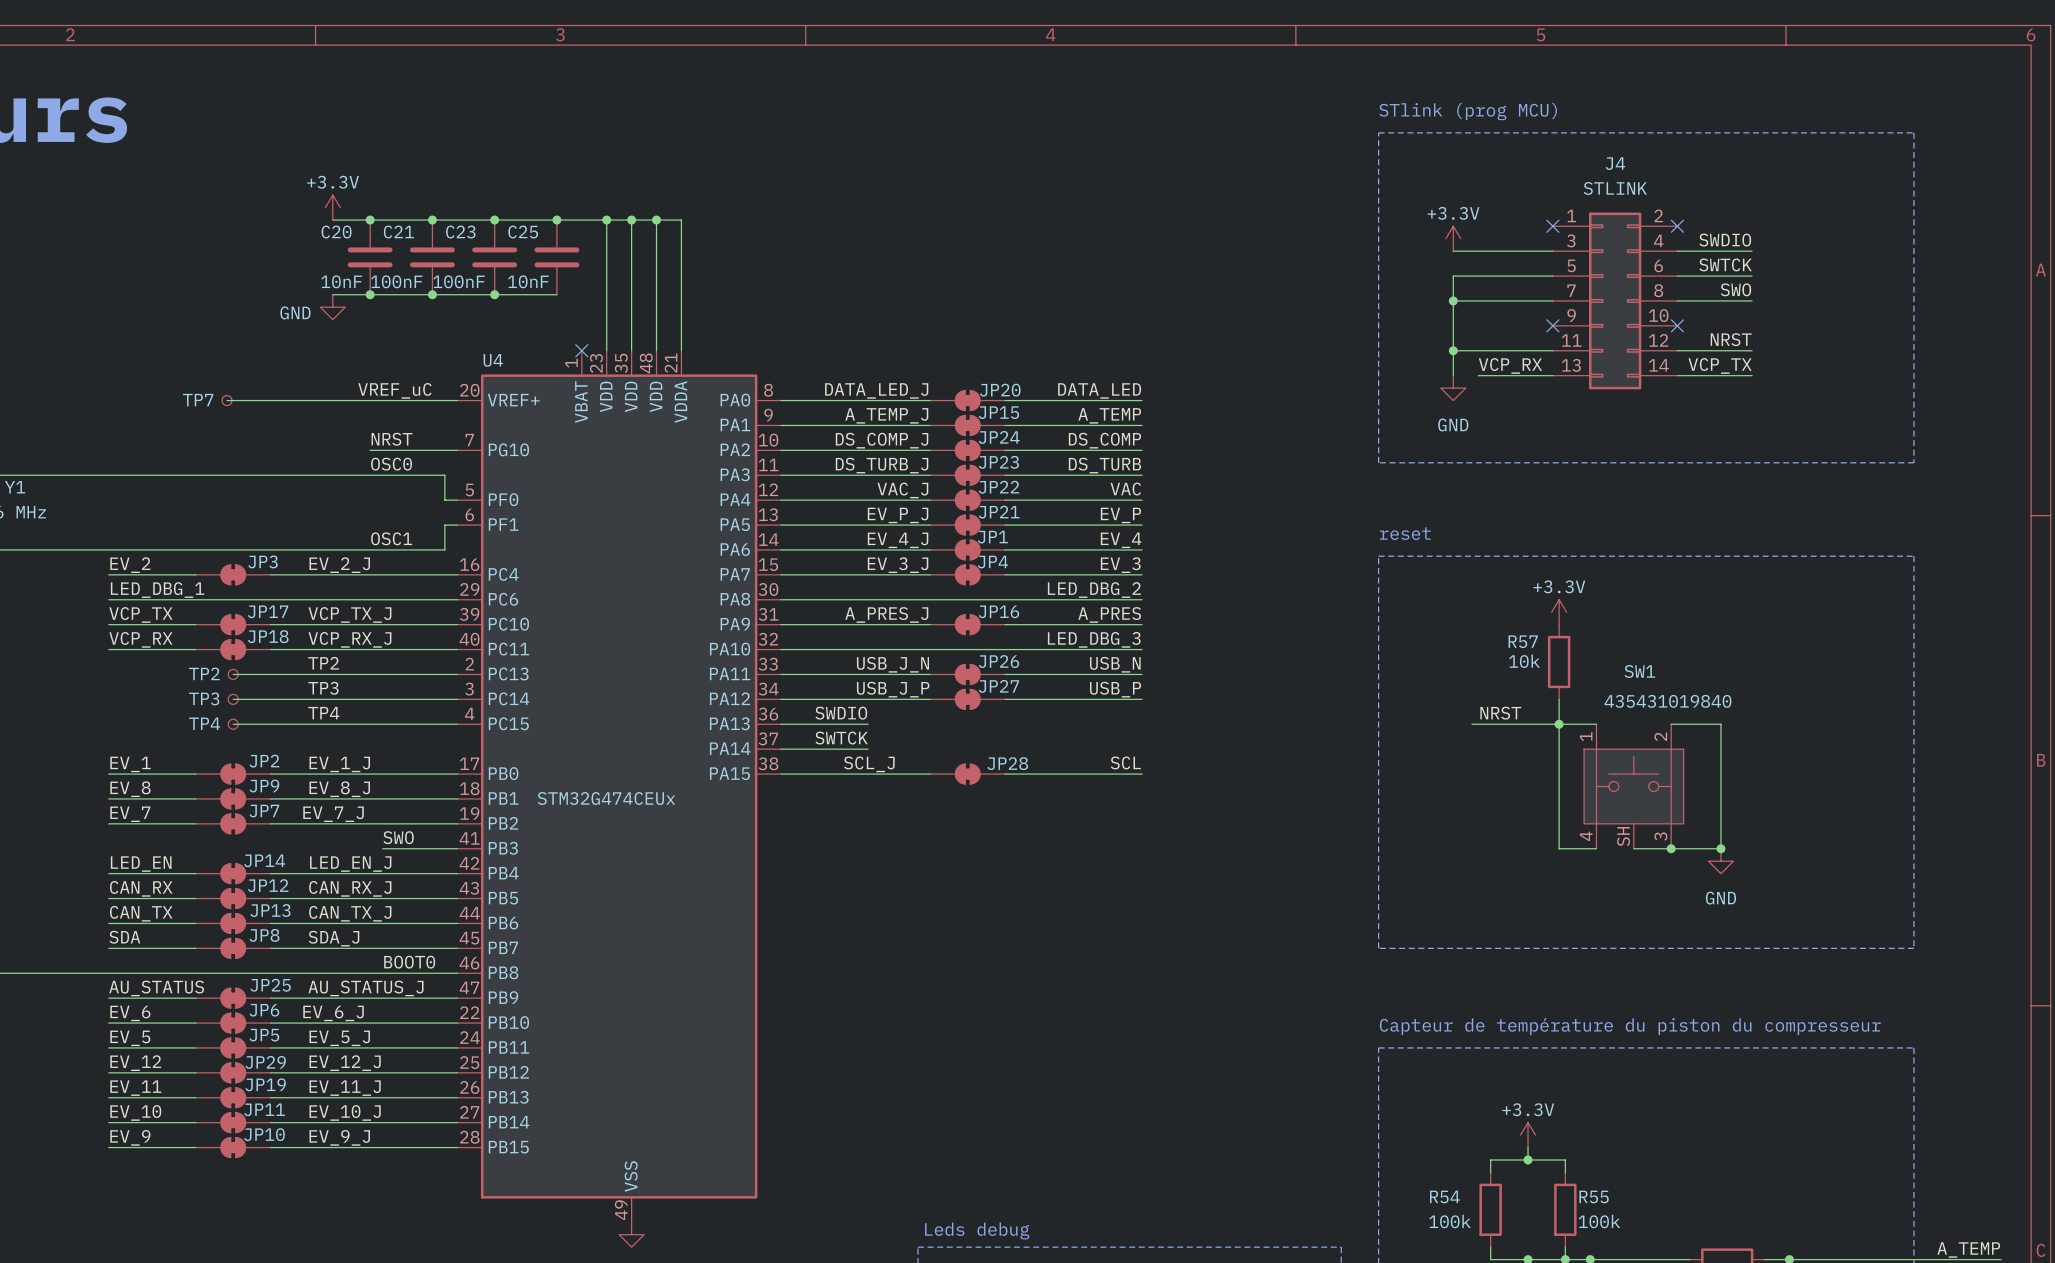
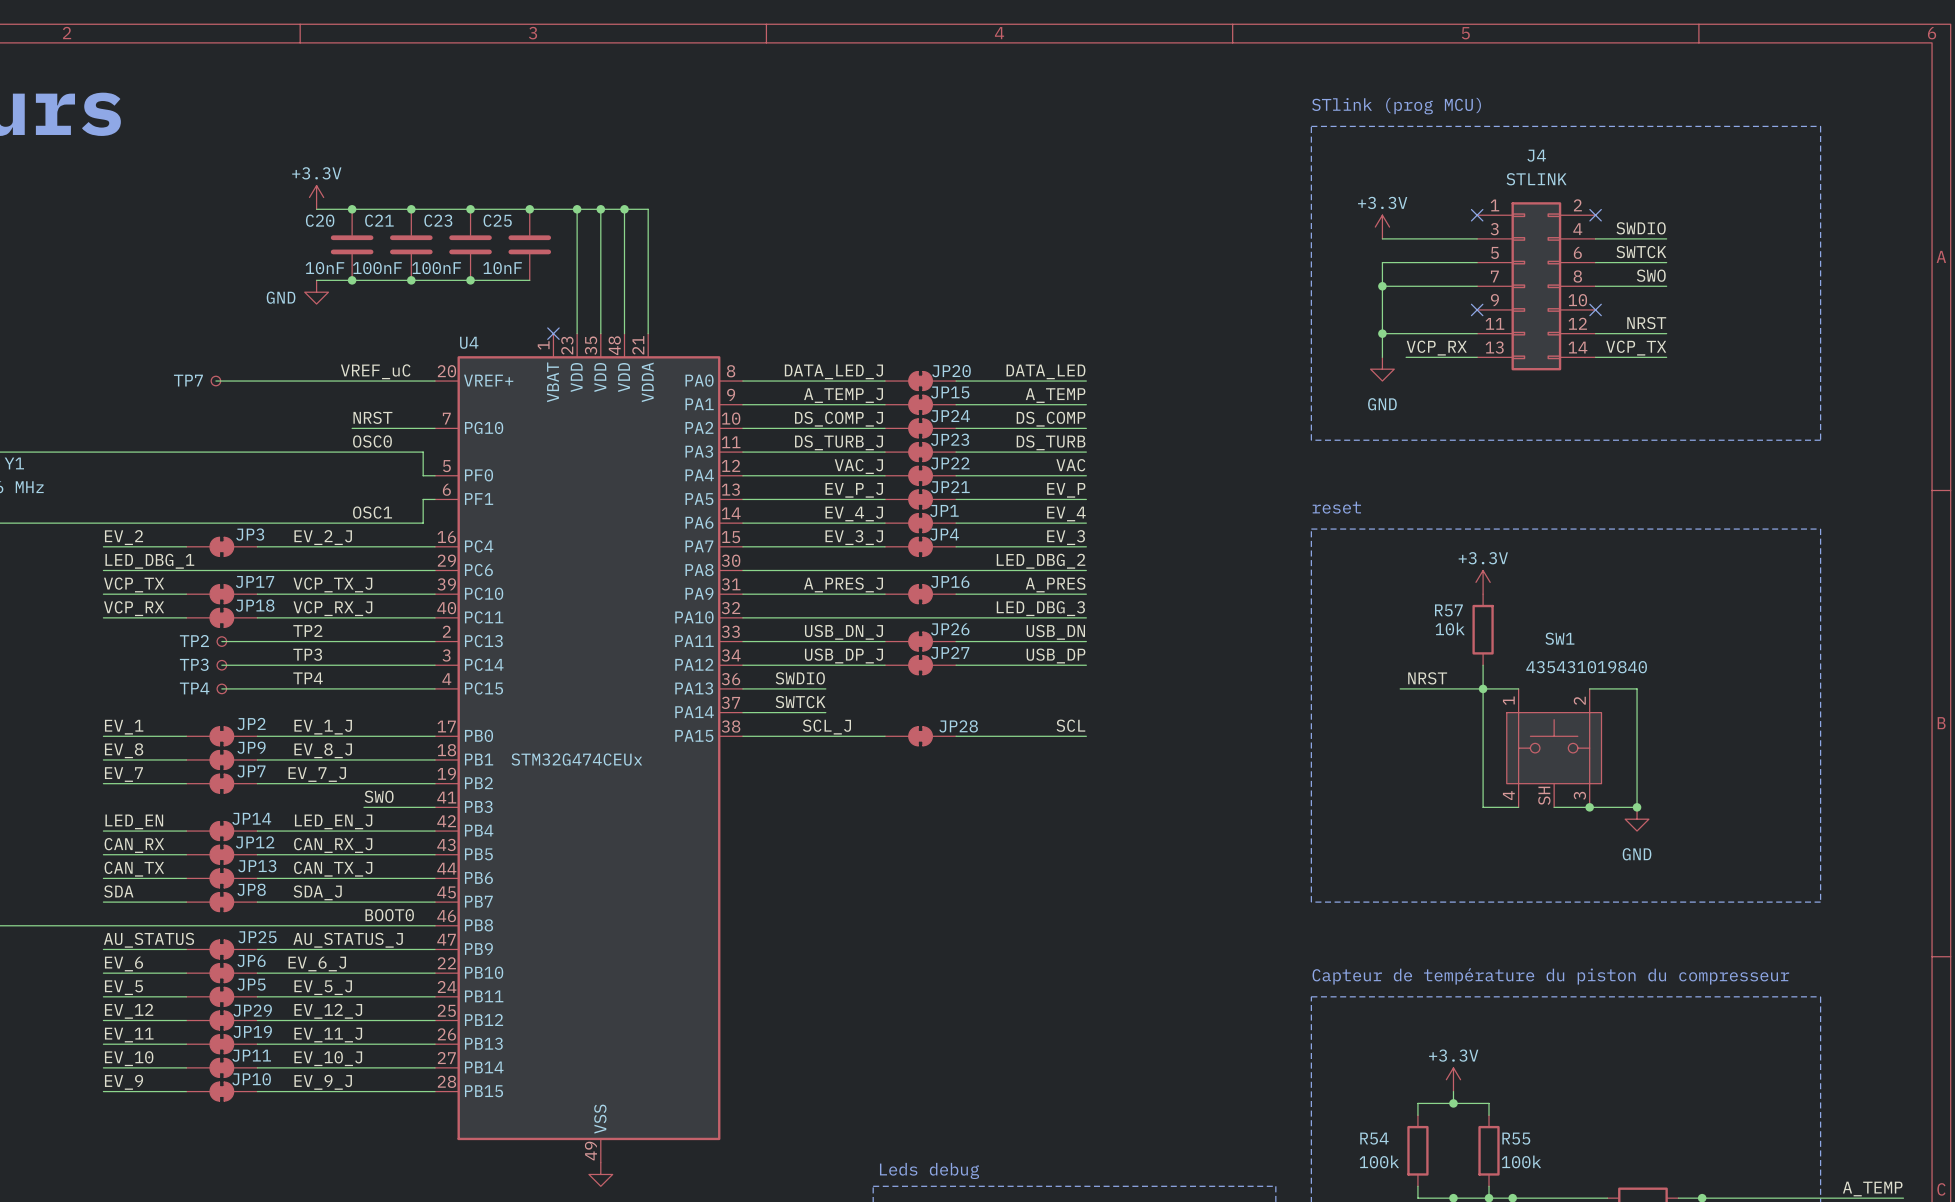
label: USB_J_N (892, 664) -> USB_DN_J (843, 632)
label: USB_N (1115, 664) -> USB_DN (1055, 632)
label: USB_J_P (893, 689) -> USB_DP_J (843, 656)
label: USB_P (1115, 689) -> USB_DP (1056, 656)

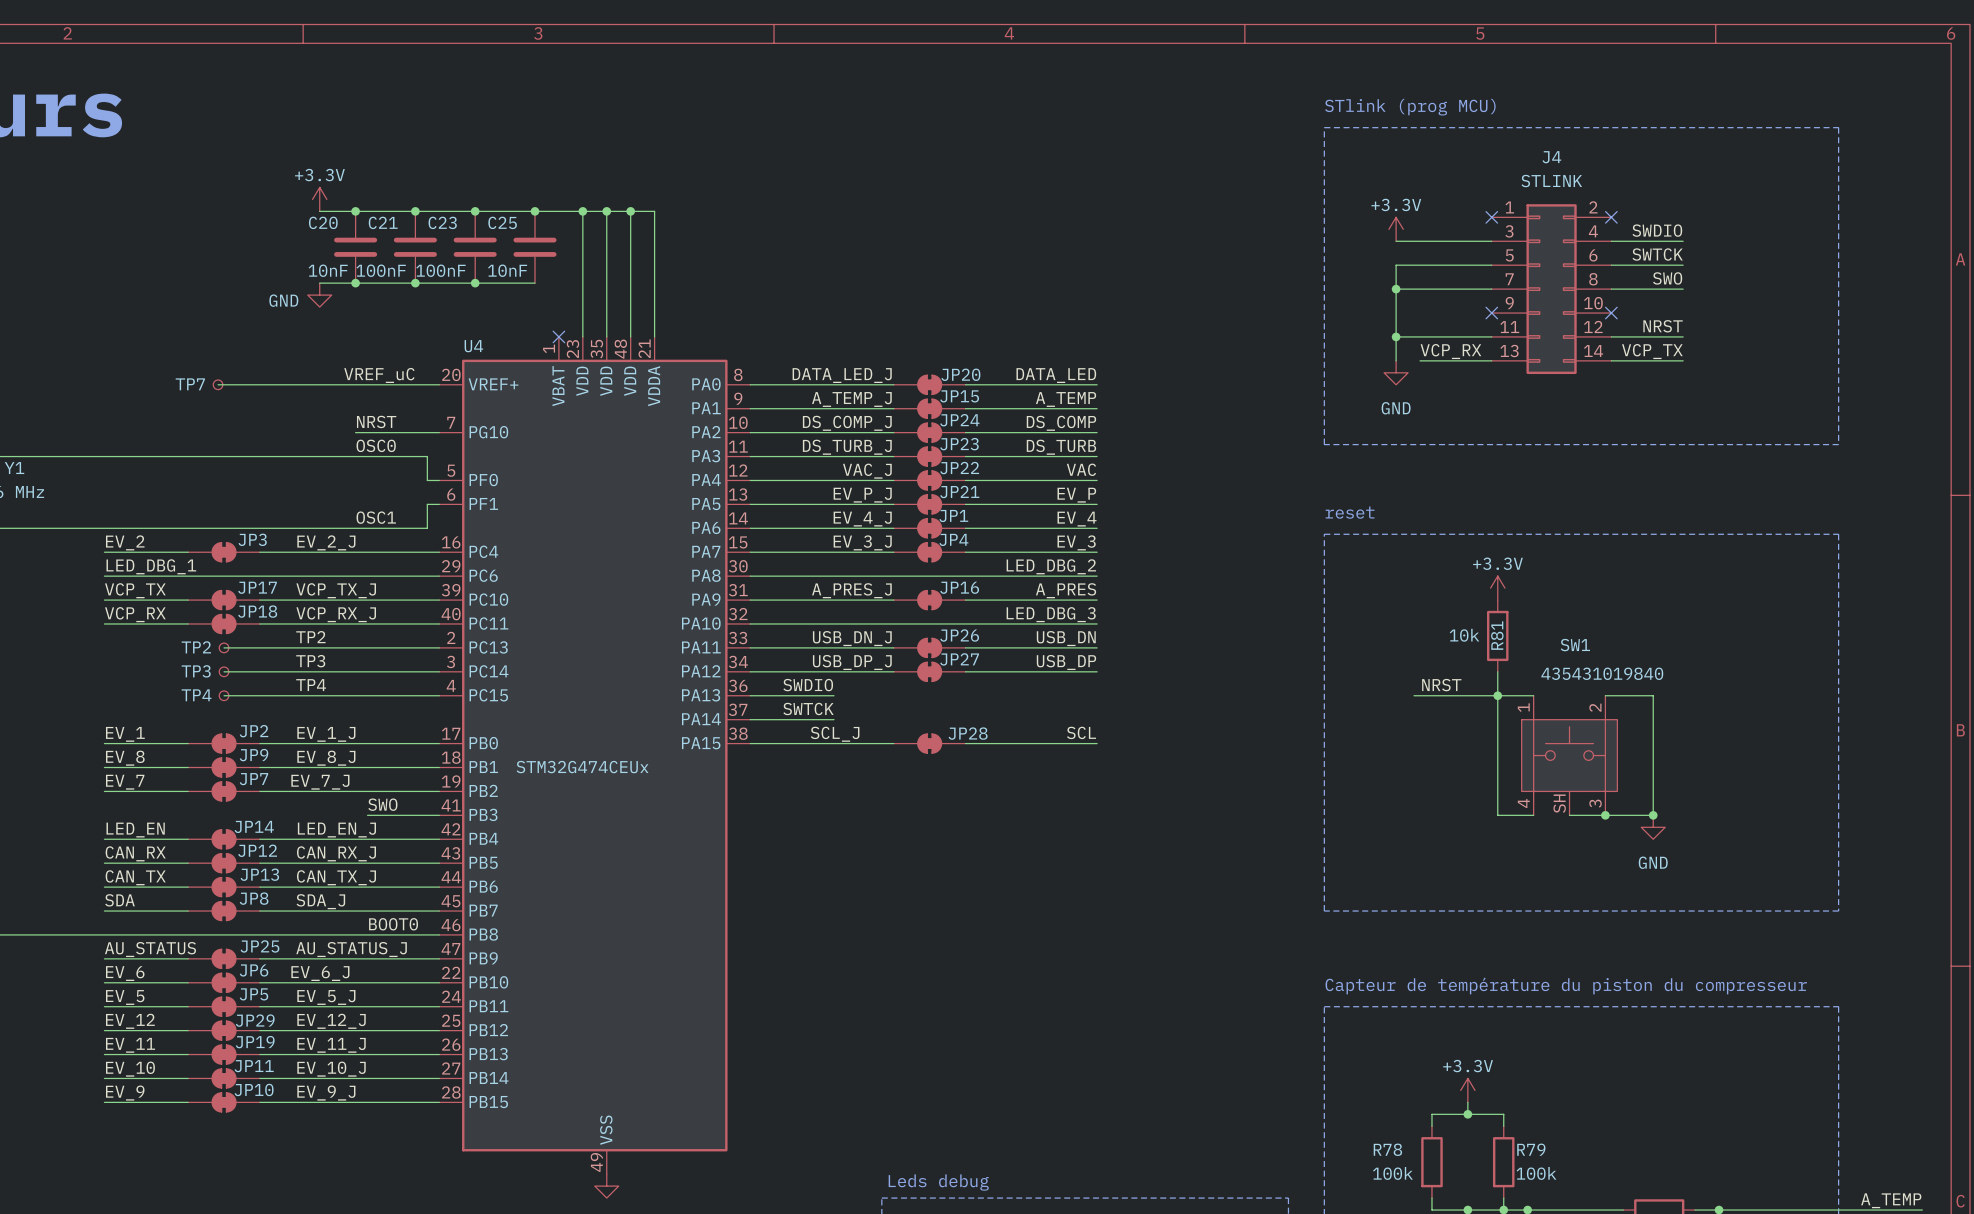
R57 name: R57 (1448, 610) -> R81 (1497, 635)
R54 name: R54 (1374, 1138) -> R78 (1387, 1149)
R55 name: R55 (1516, 1138) -> R79 (1531, 1149)

